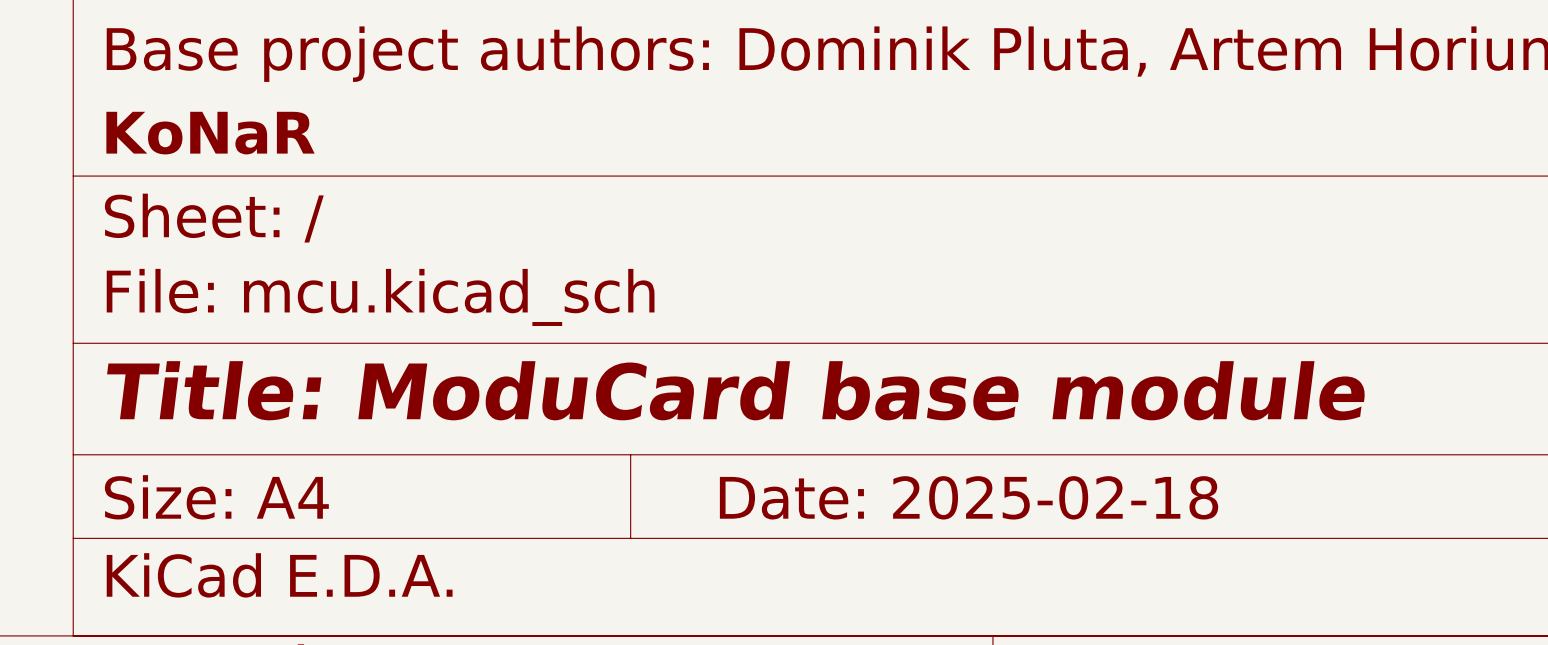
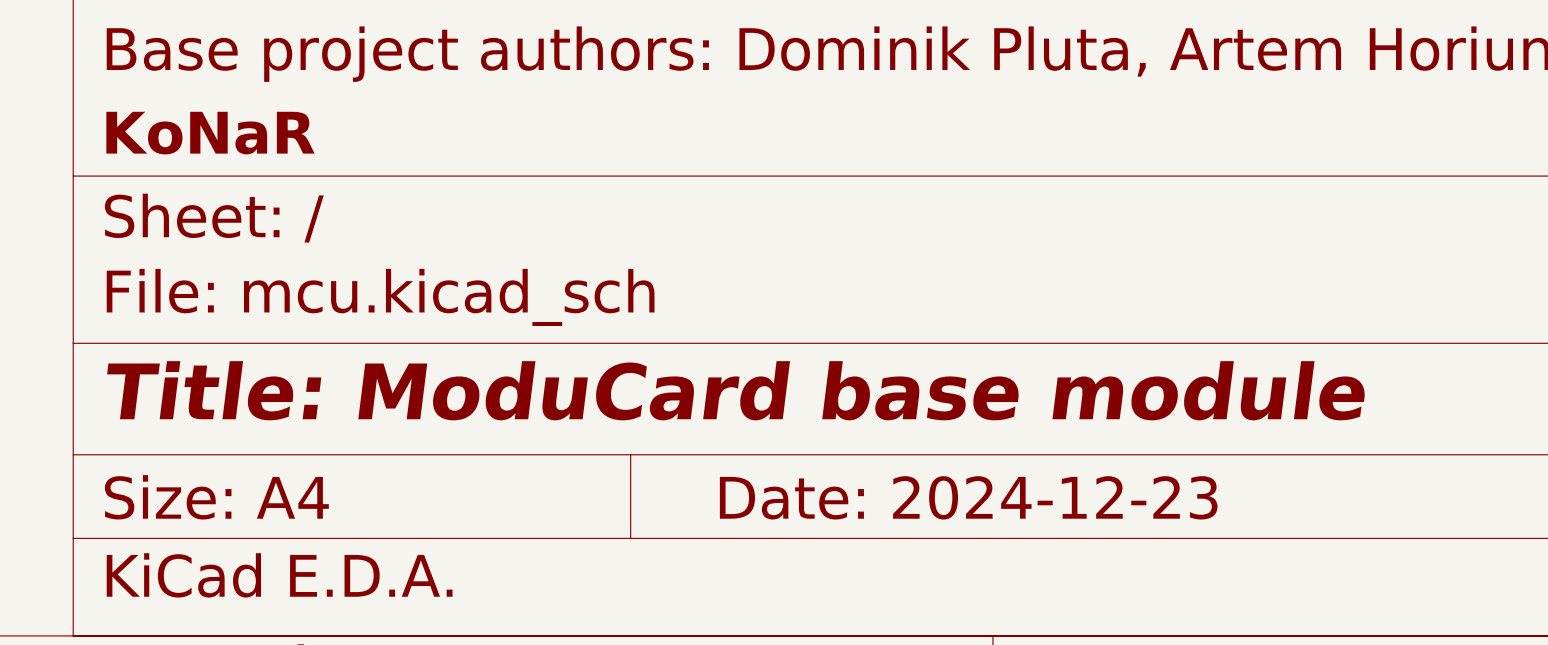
title block: Date: 2025-02-18 (969, 497) -> Date: 2024-12-23 (968, 497)

